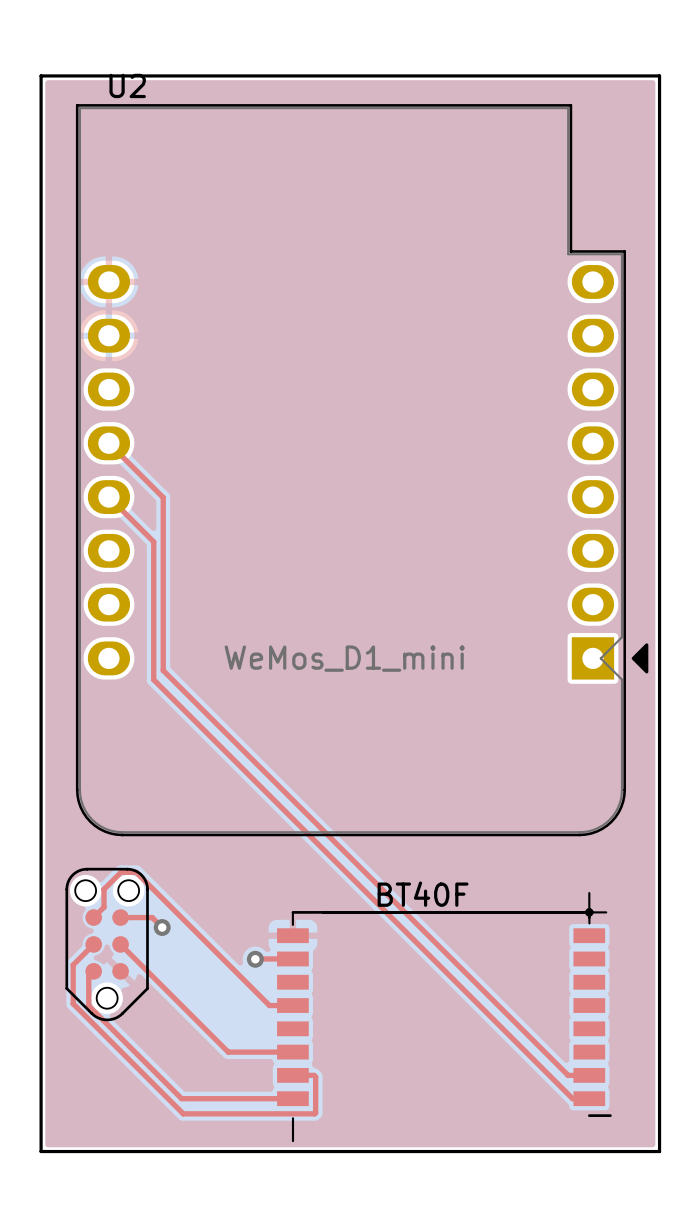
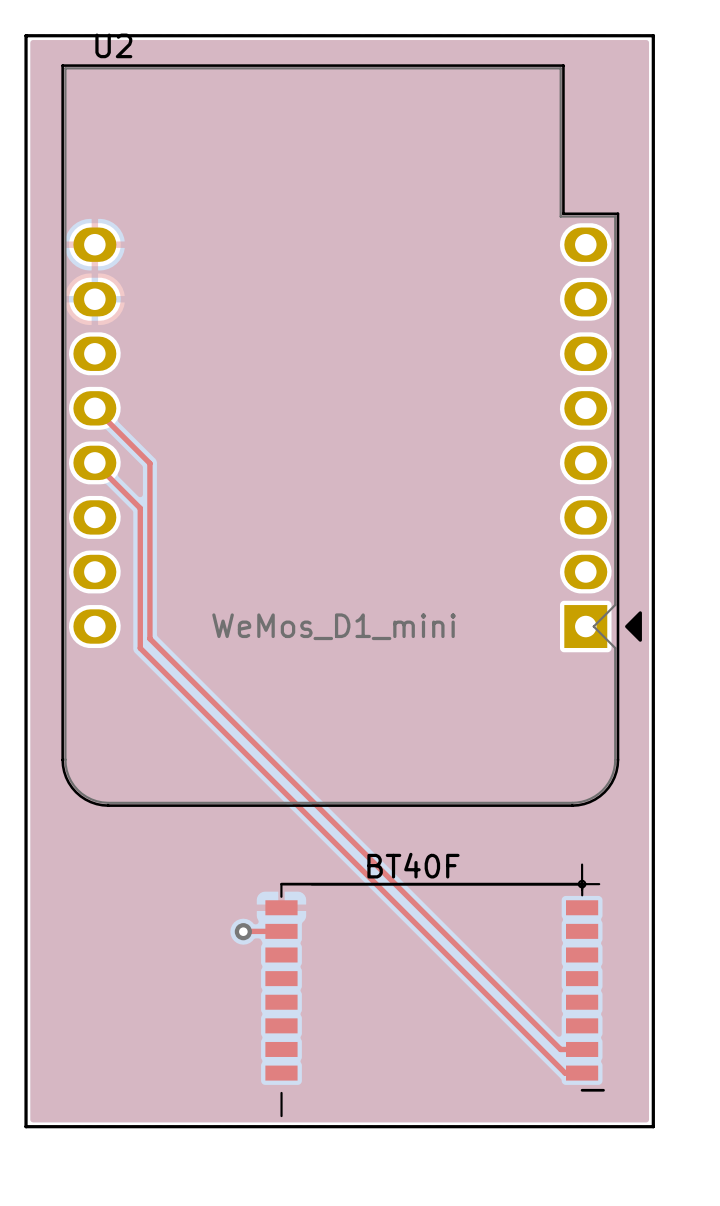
top track: (93, 917) (104, 907) (104, 889) (121, 872) (136, 872) (269, 1005) (292, 1005) -> none
top track: (120, 917) (152, 917) (162, 927) -> none
via: (162, 927) -> none
top track: (93, 944) (73, 964) (73, 1003) (183, 1113) (314, 1113) (315, 1076) (292, 1075) -> none
part: (107, 944) -> none
top track: (120, 944) (228, 1052) (292, 1052) -> none
top track: (93, 971) (88, 976) (88, 1005) (181, 1098) (292, 1098) -> none

